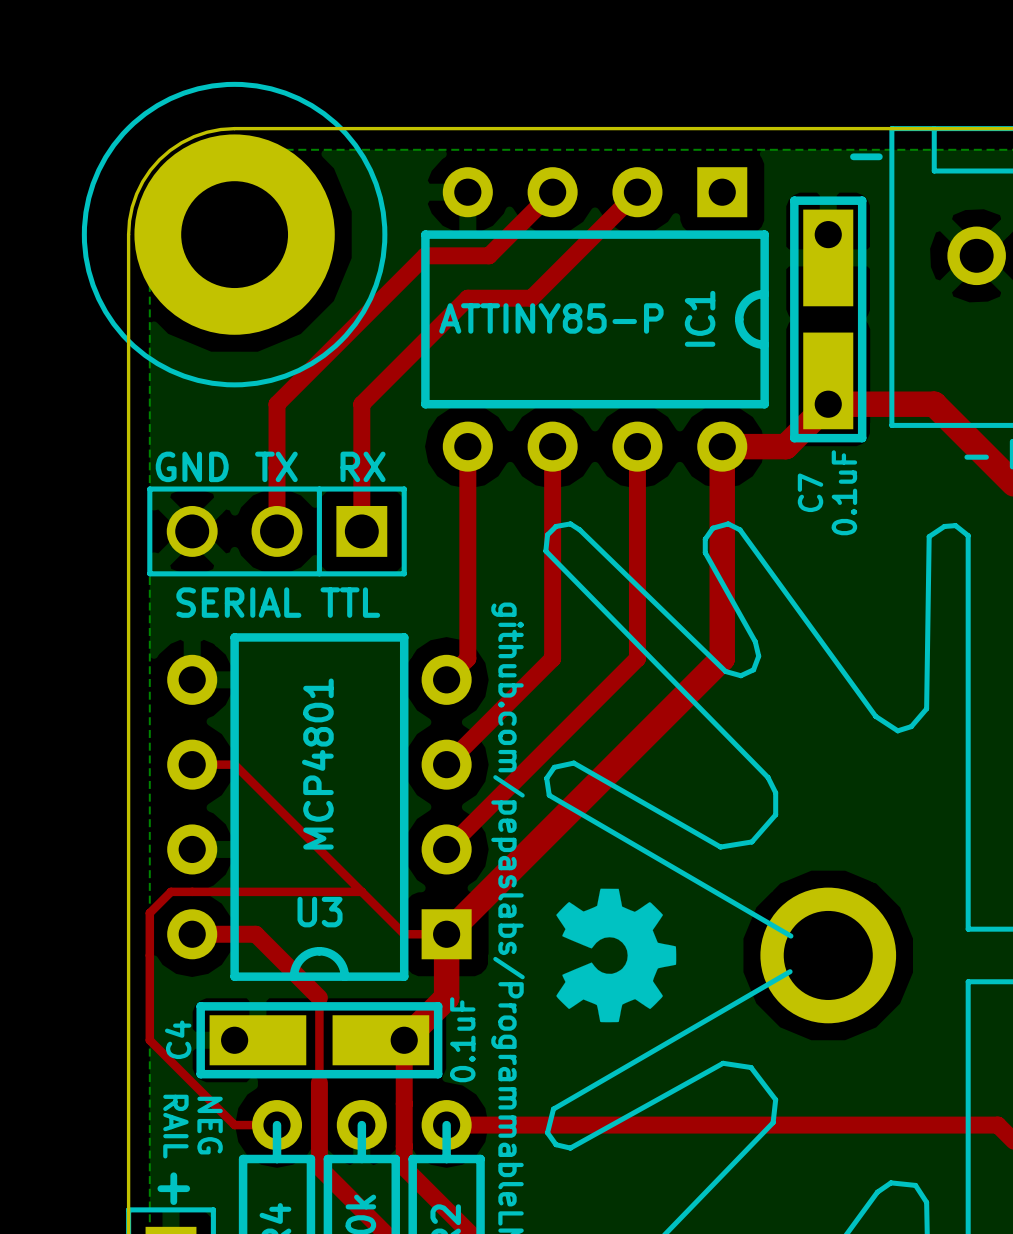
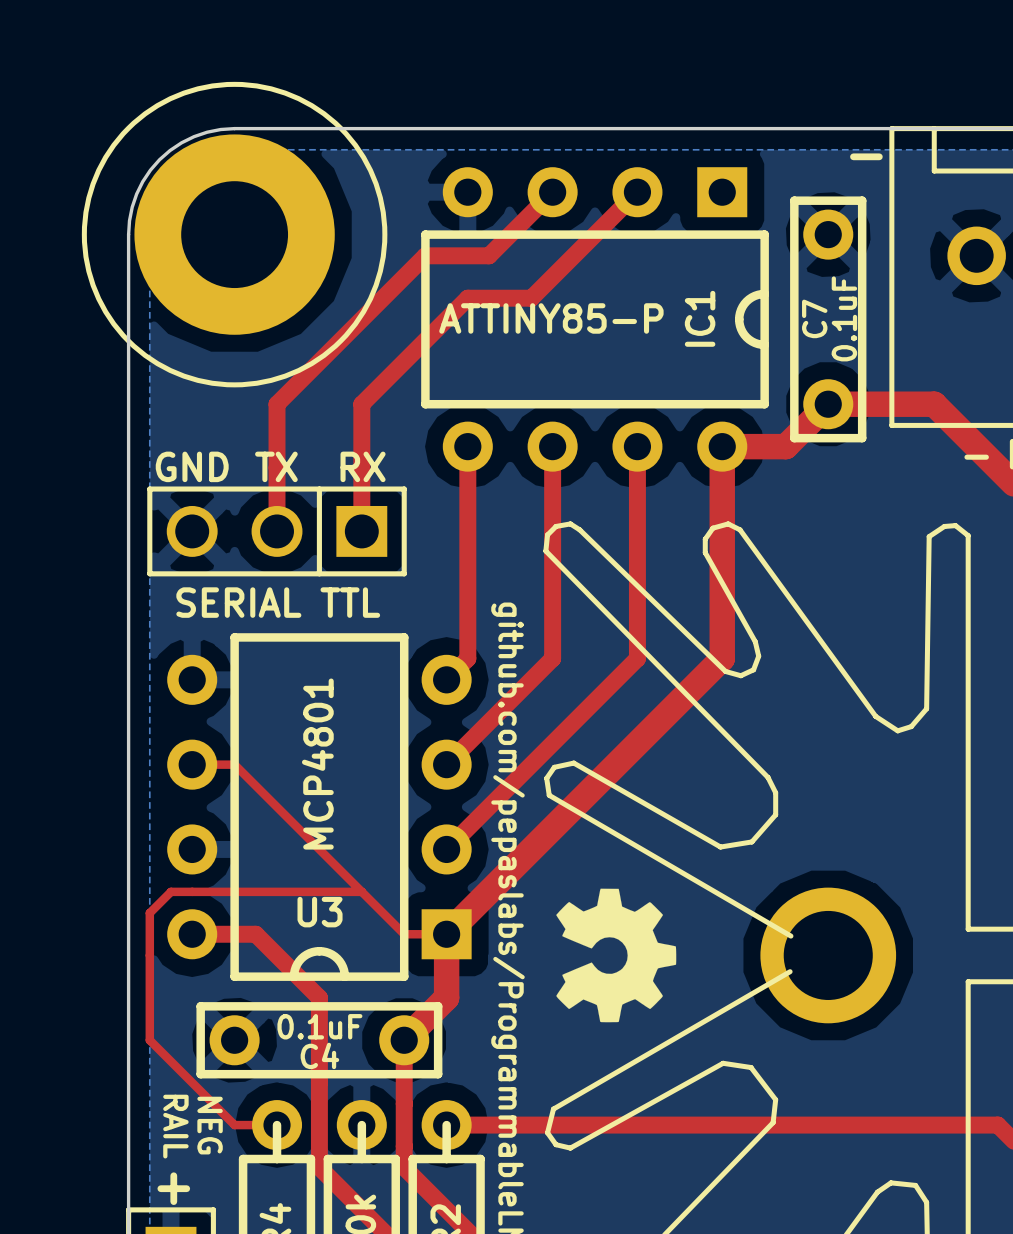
C7 footprint: [790, 196, 867, 443] -> [790, 196, 867, 443]
C7 name position: C7 (810, 492) -> C7 (814, 318)
C7 value position: 0.1uF (844, 492) -> 0.1uF (844, 318)
top track width: thin (319, 997) (319, 1082) -> thick (319, 997) (319, 1082)
C4 footprint: [196, 1002, 443, 1079] -> [196, 1002, 443, 1079]
C4 name position: C4 (178, 1039) -> C4 (319, 1055)
C4 value position: 0.1uF (462, 1039) -> 0.1uF (319, 1026)

